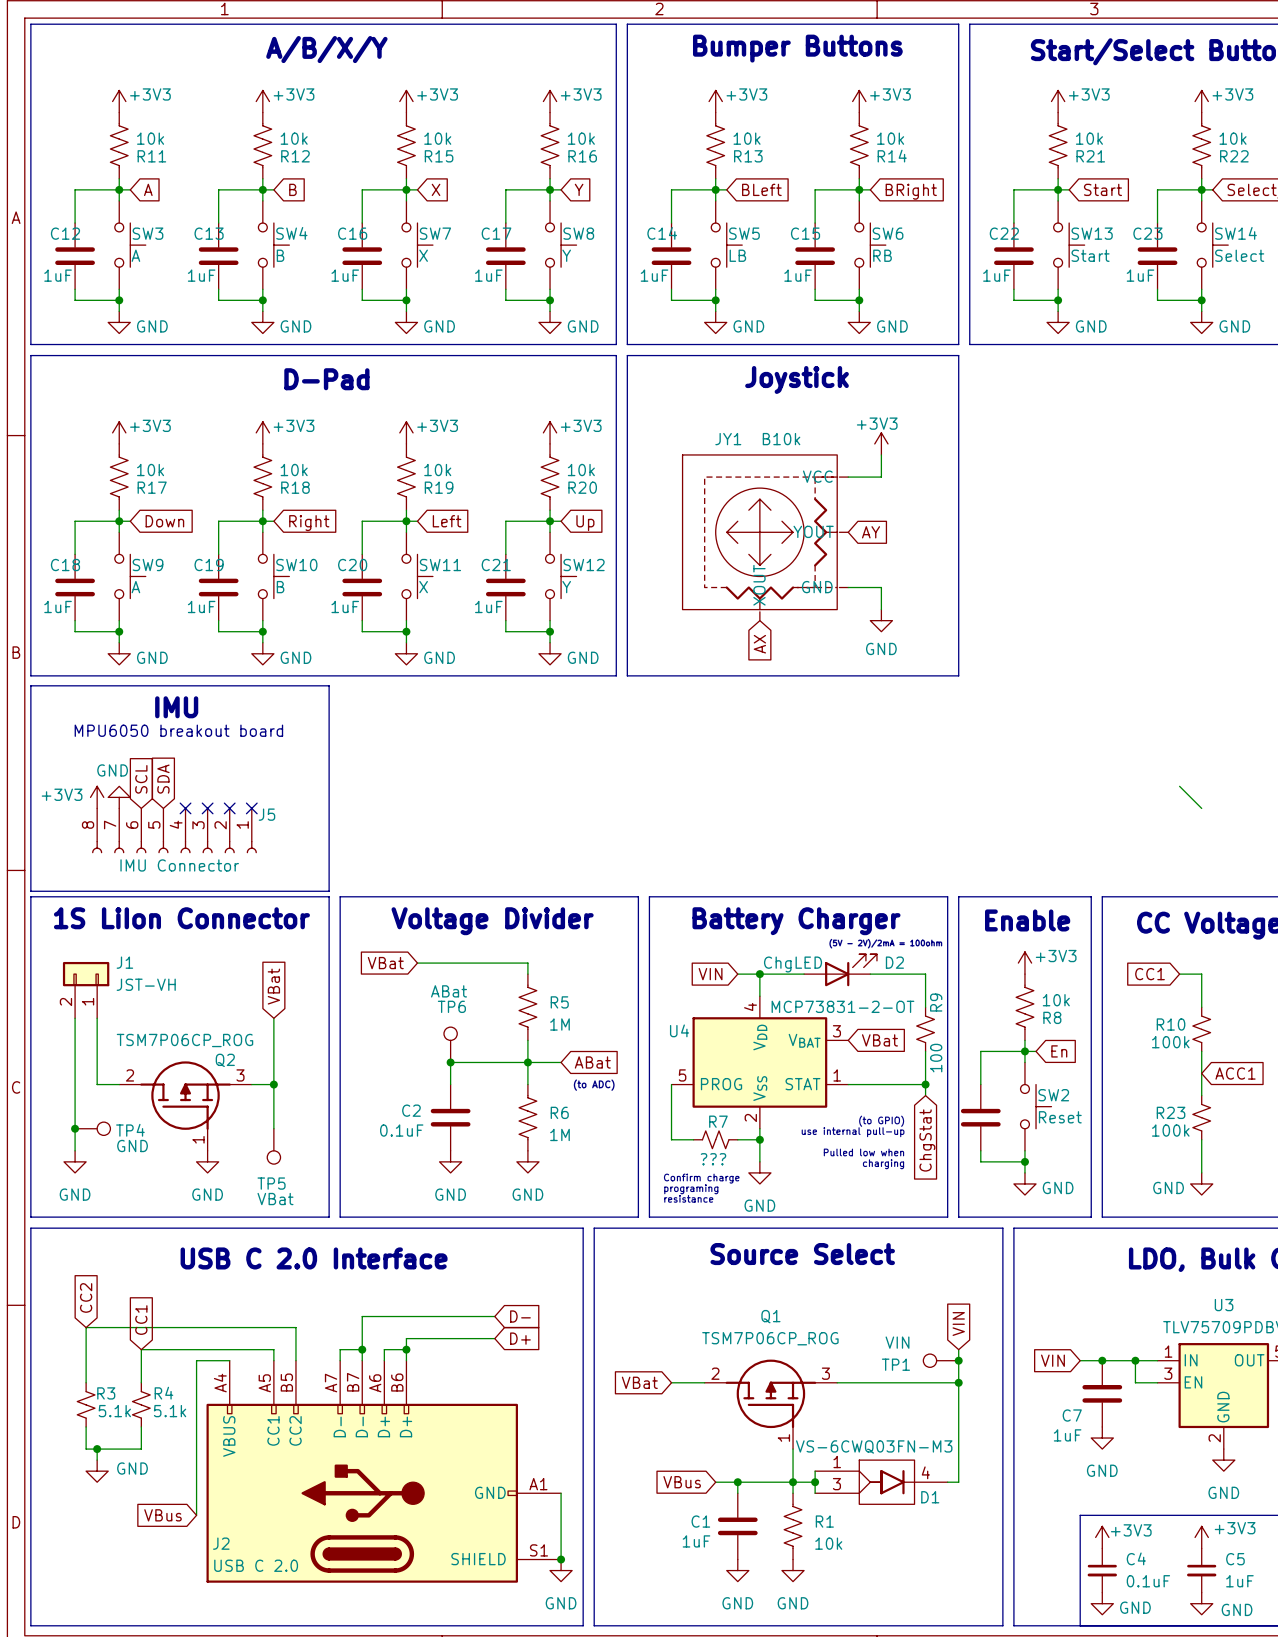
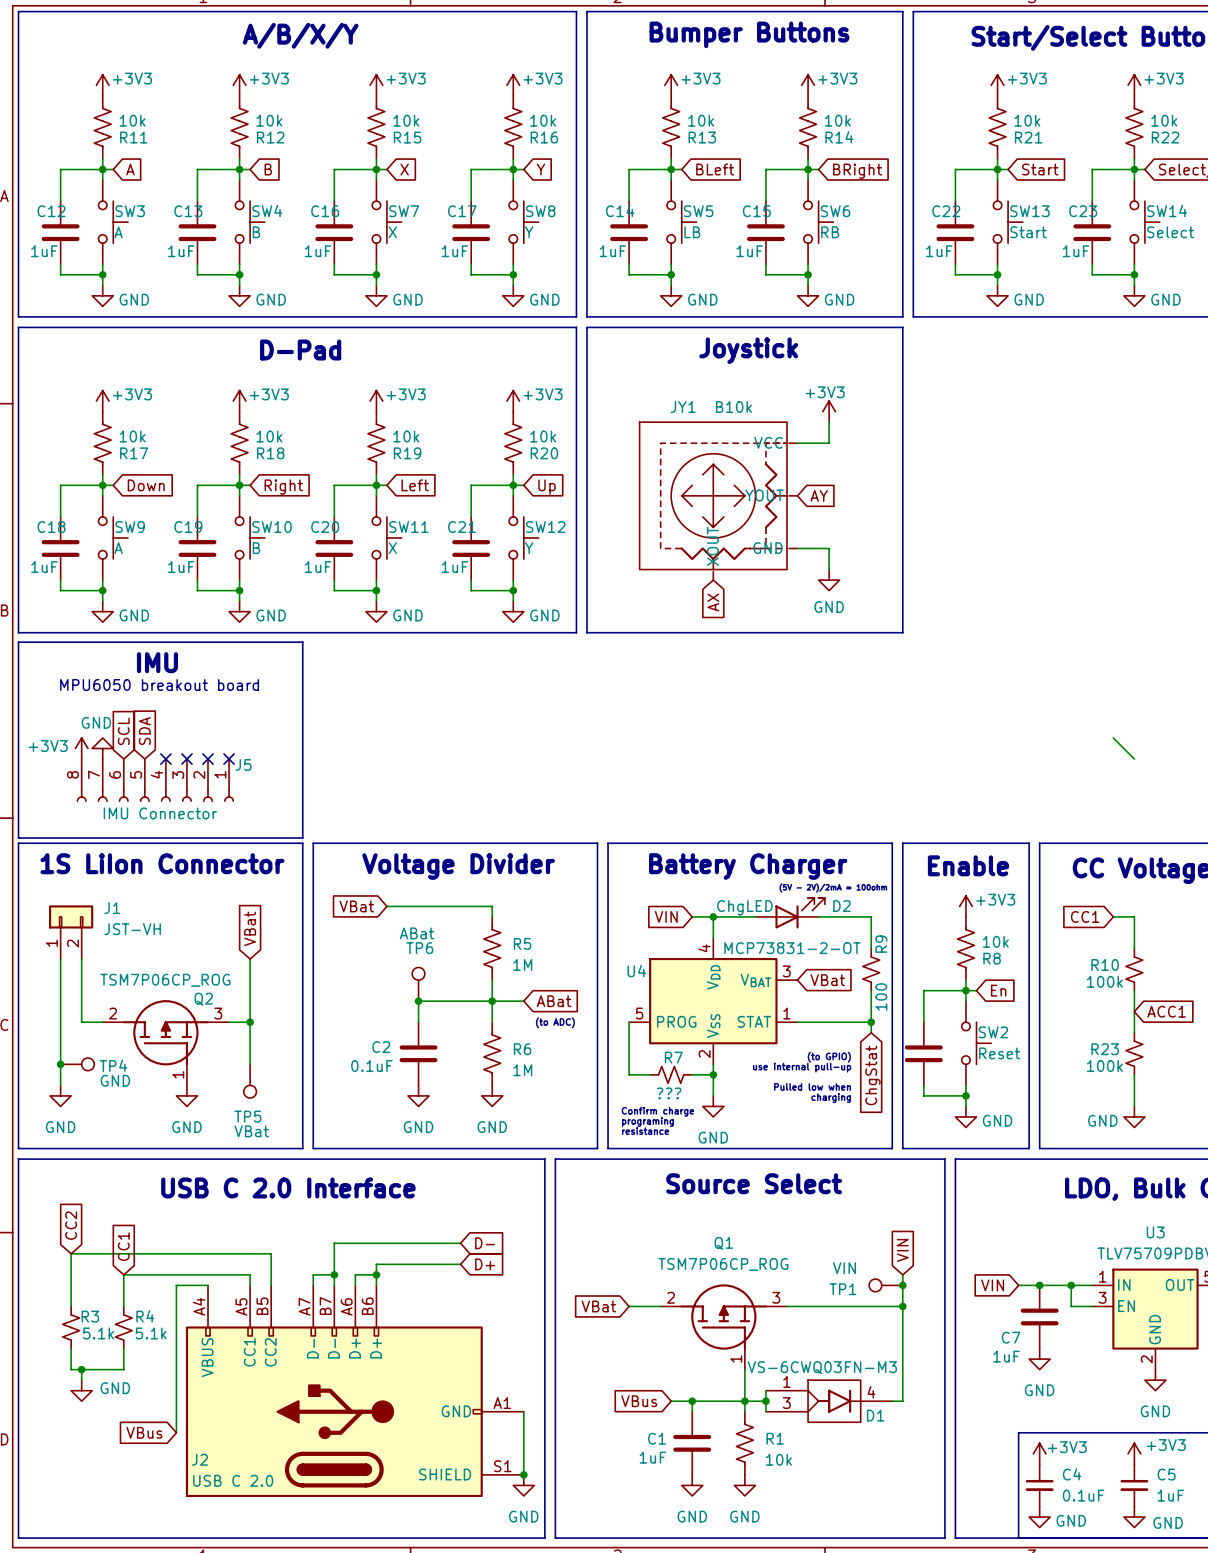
J1 flip: as is (86, 974) -> left-right (71, 916)

